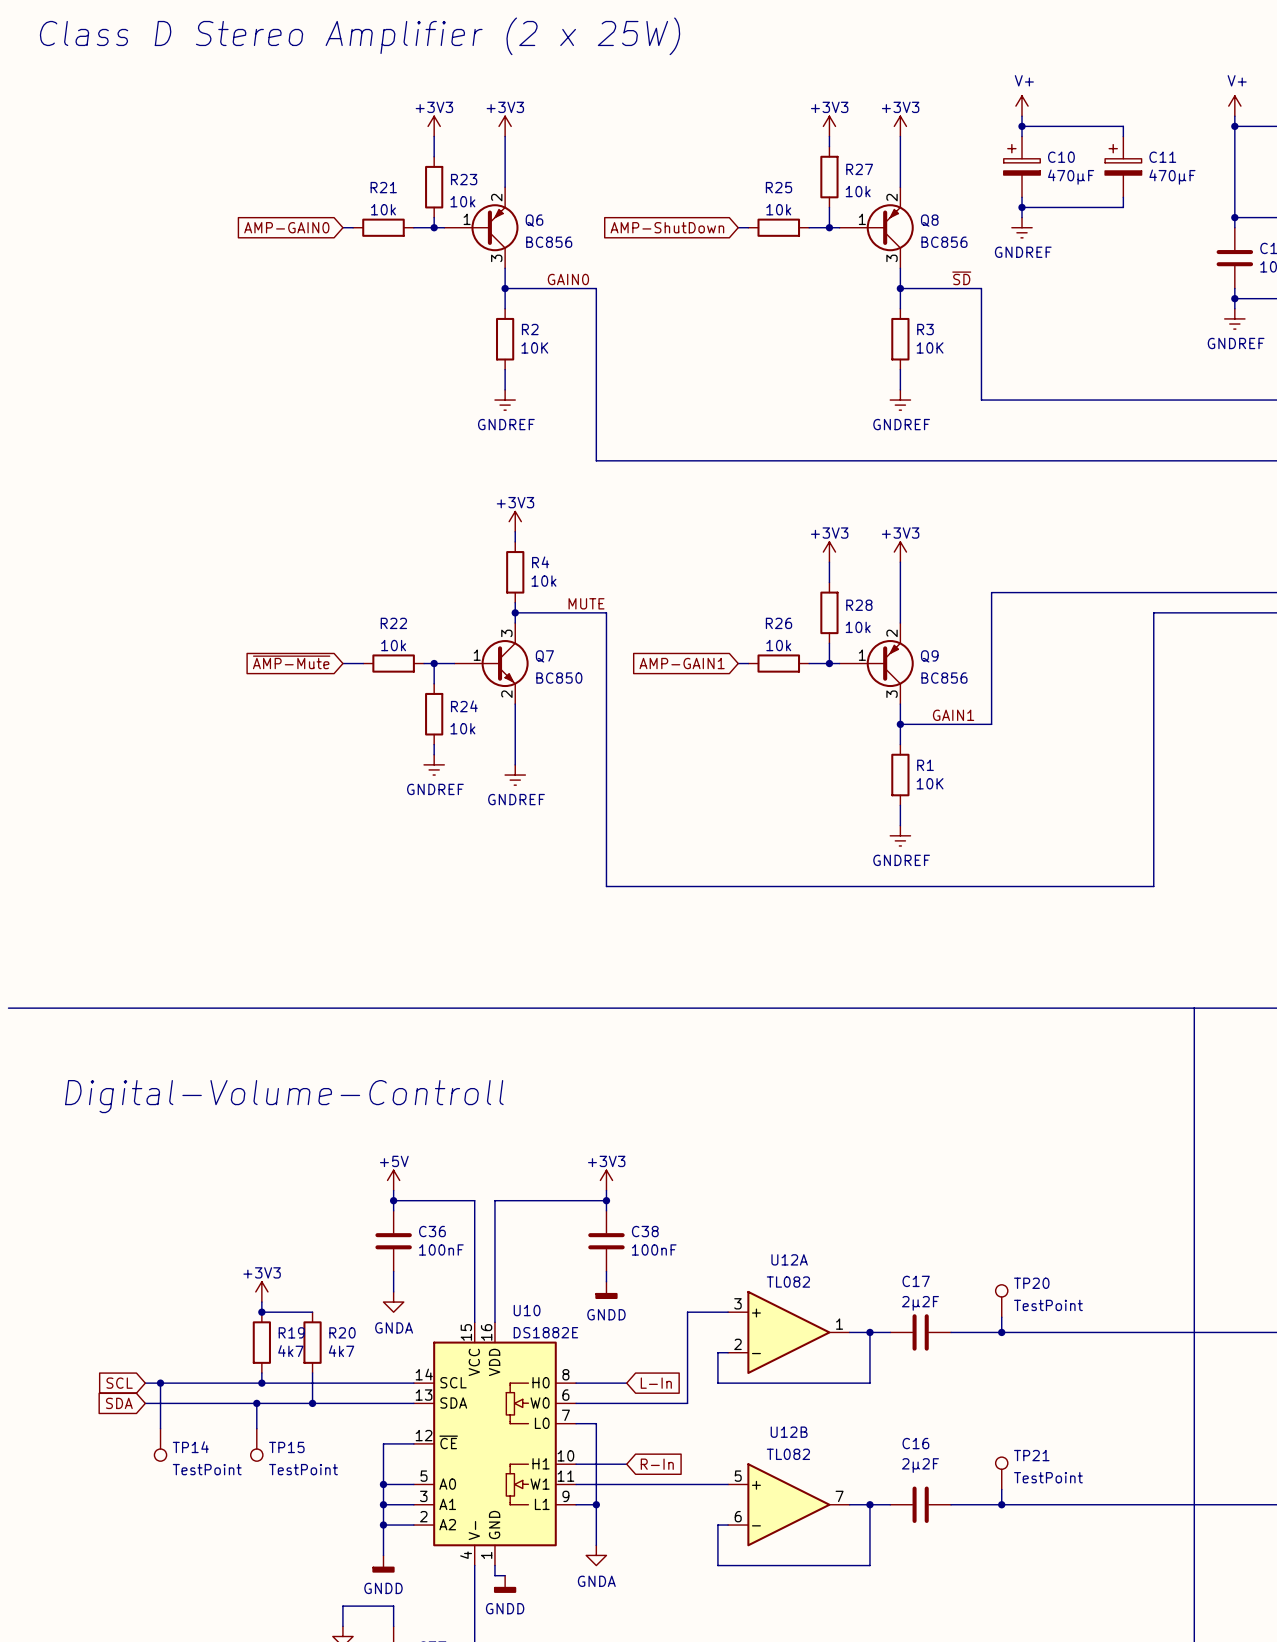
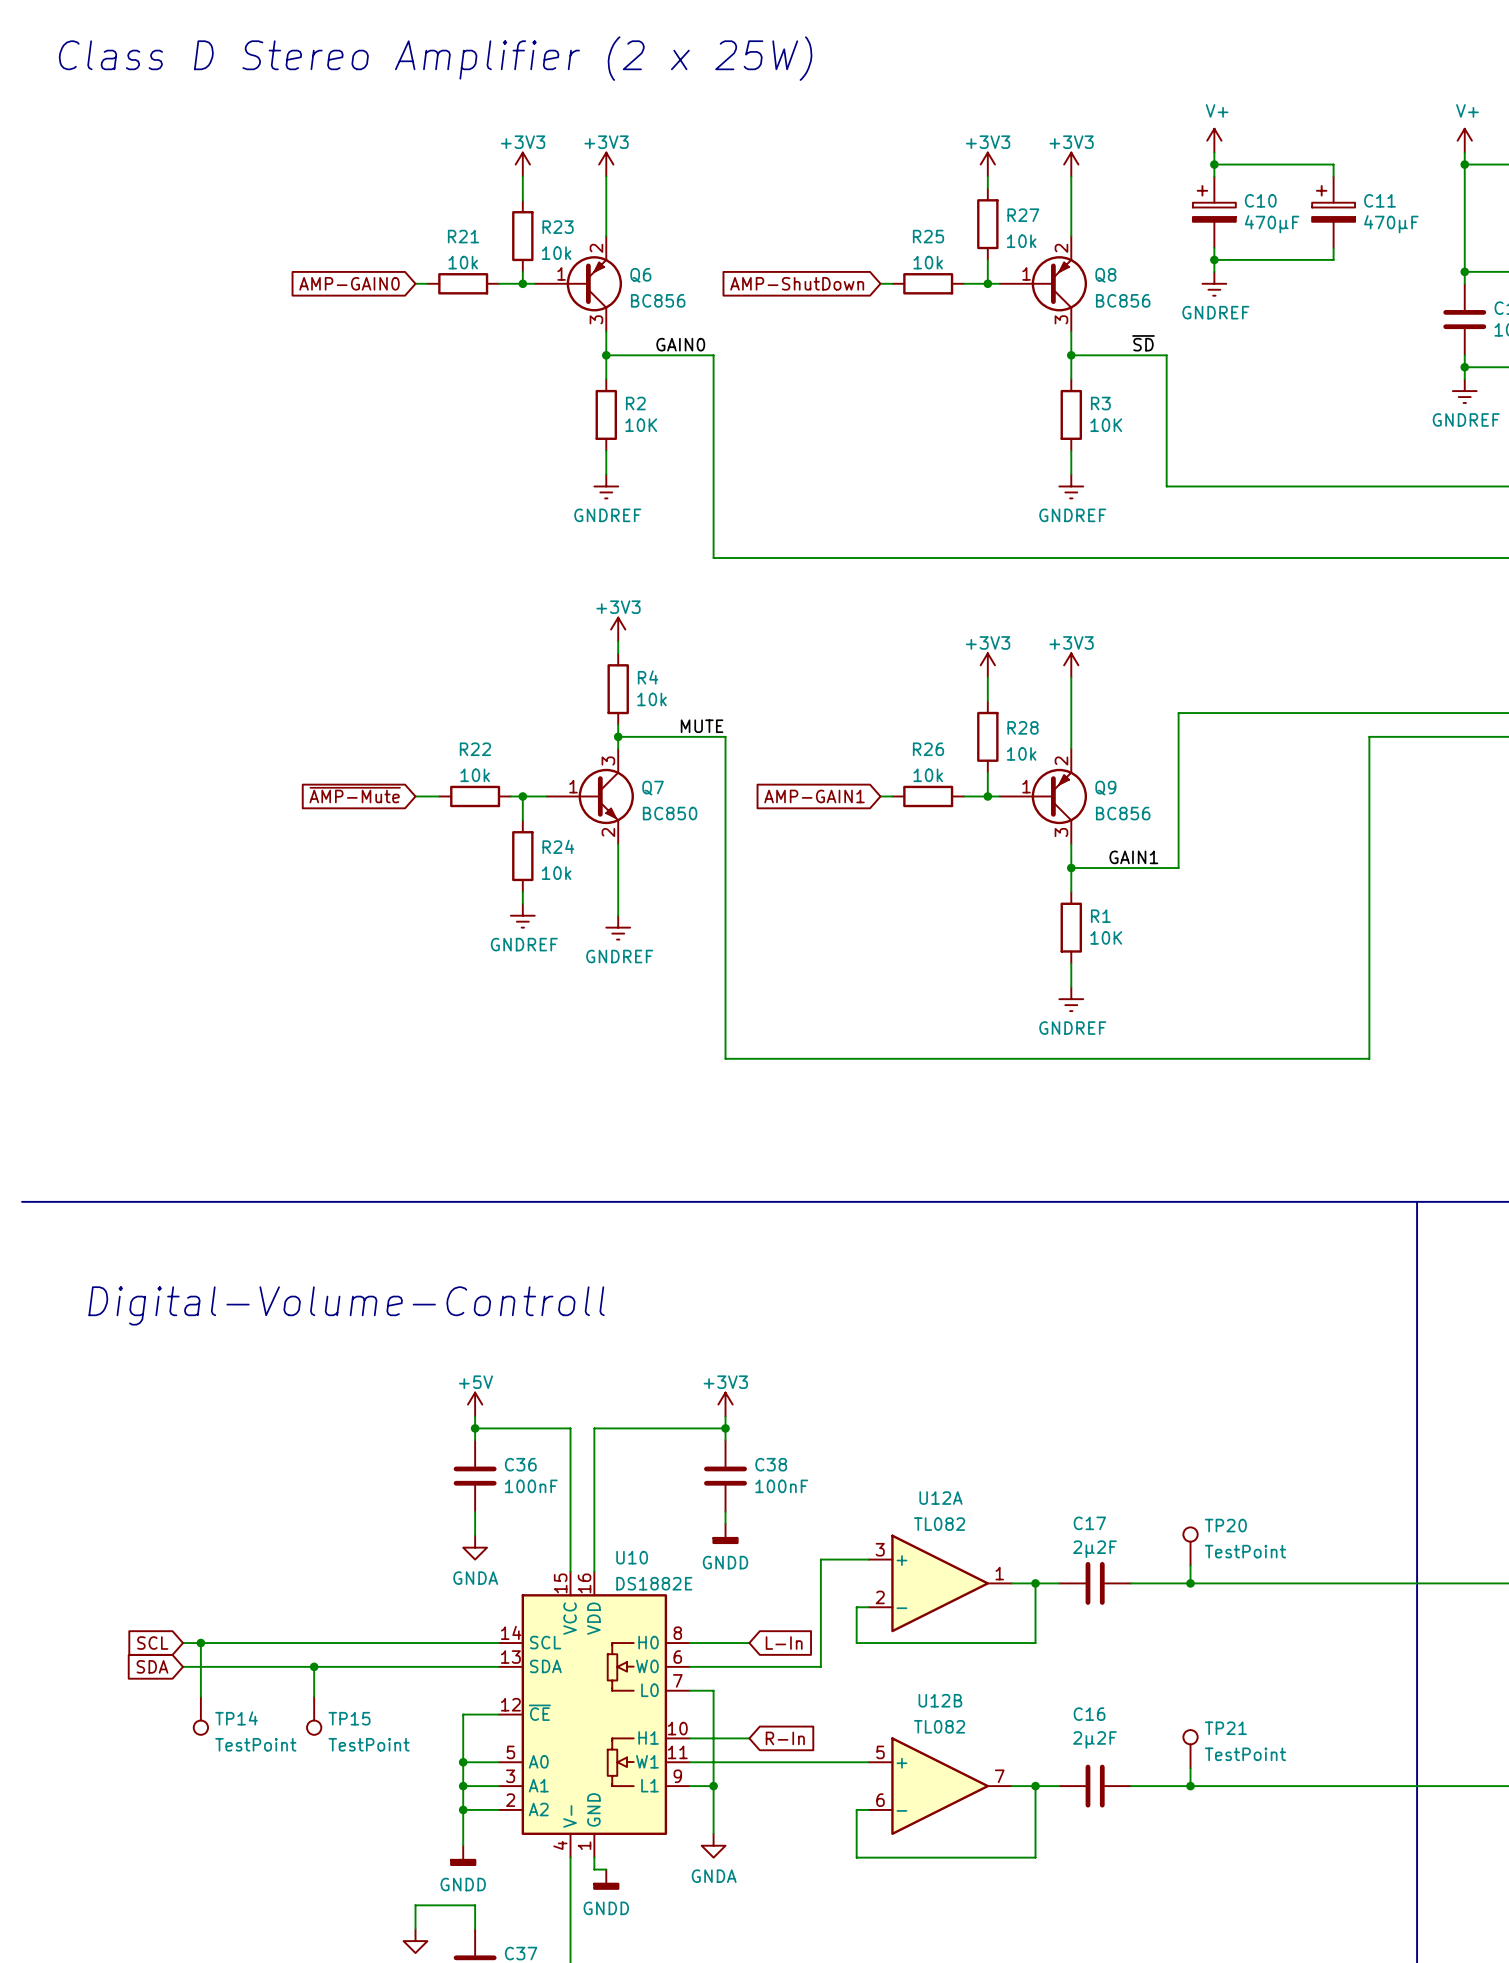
power symbol: +3V3 (261, 1291) -> none
wire: (261, 1302) (261, 1312) (312, 1312) -> none
junction: (261, 1312) -> none
R19: 4k7 (261, 1342) -> none
R20: 4k7 (312, 1342) -> none
wire: (261, 1372) (261, 1383) -> none
wire: (312, 1372) (312, 1403) -> none
junction: (261, 1383) -> none
junction: (312, 1403) -> none

